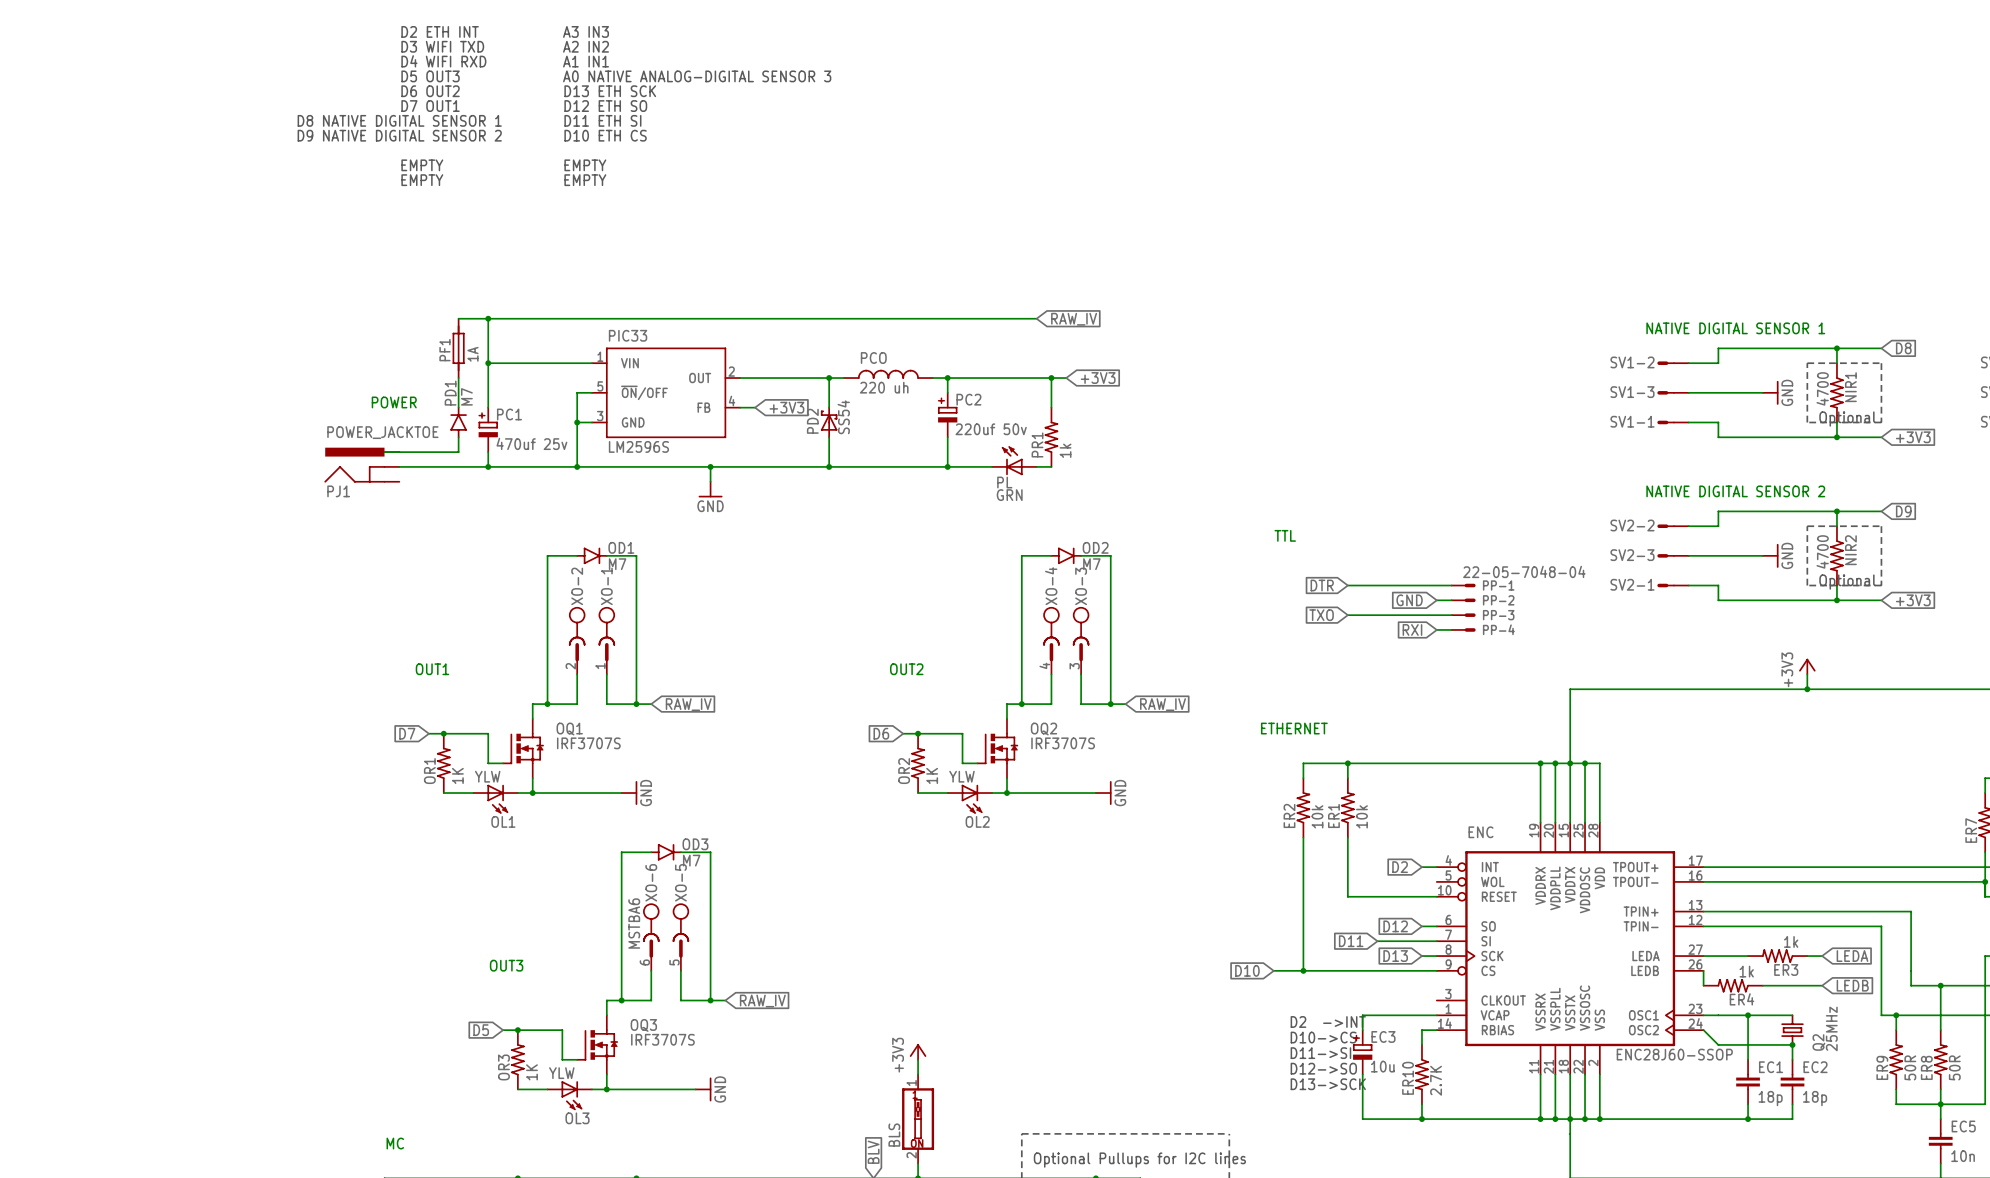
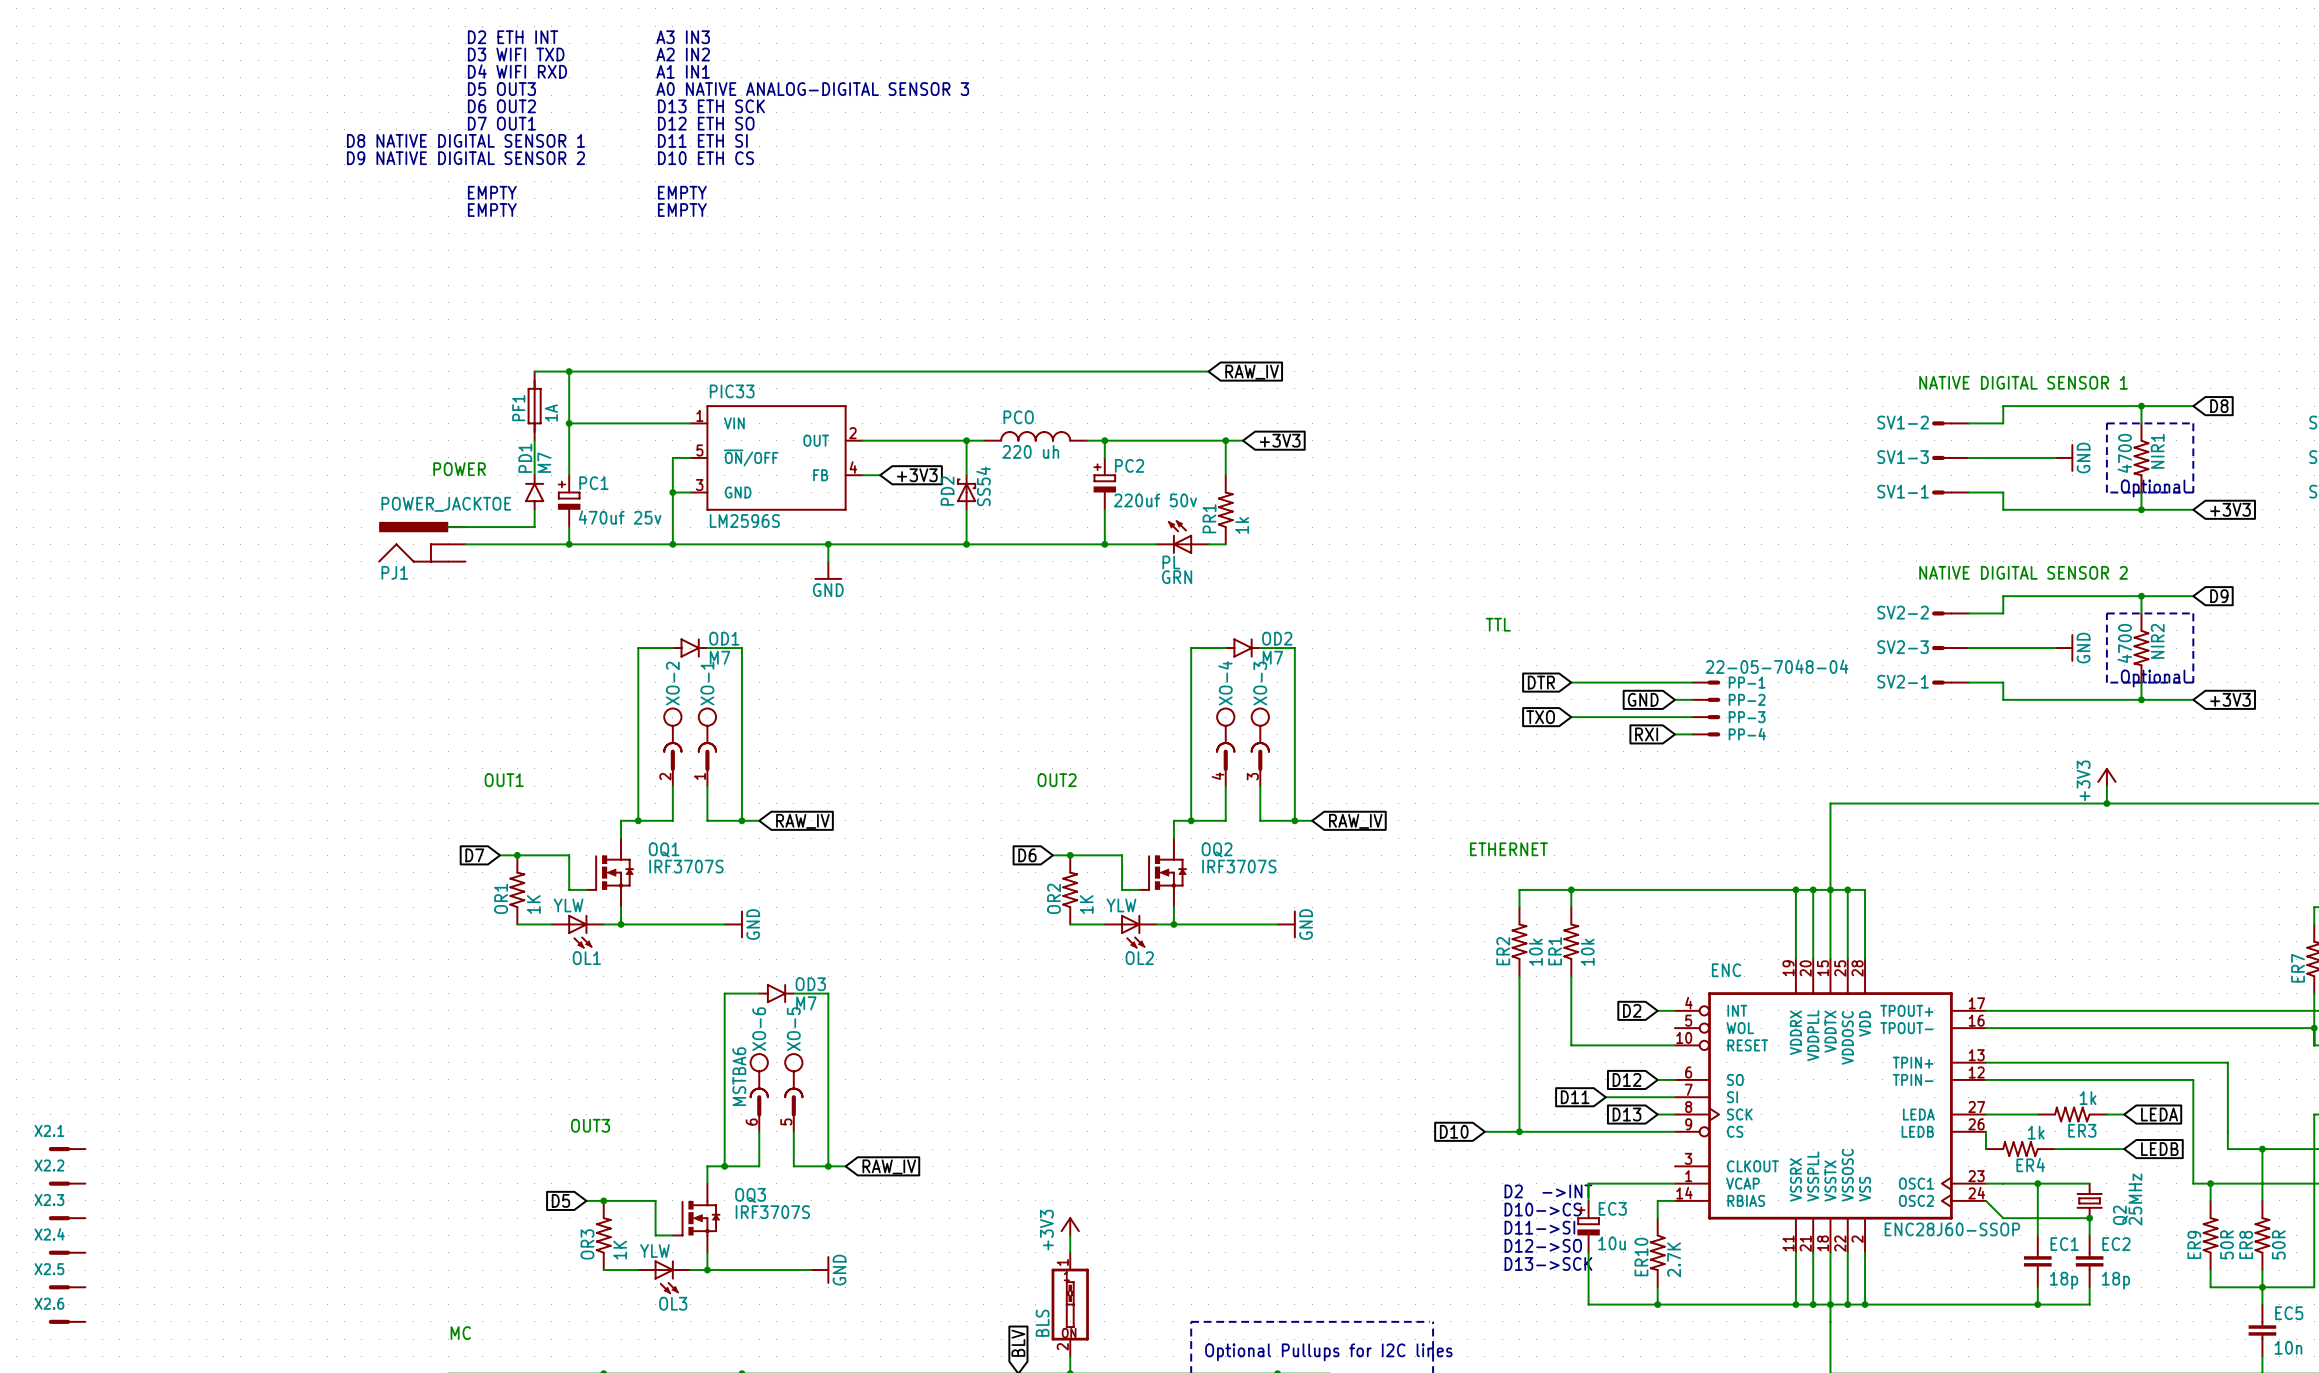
X2.1: none -> (67, 1149)
X2.2: none -> (67, 1183)
X2.3: none -> (67, 1218)
X2.4: none -> (67, 1252)
X2.5: none -> (67, 1287)
X2.6: none -> (67, 1321)

